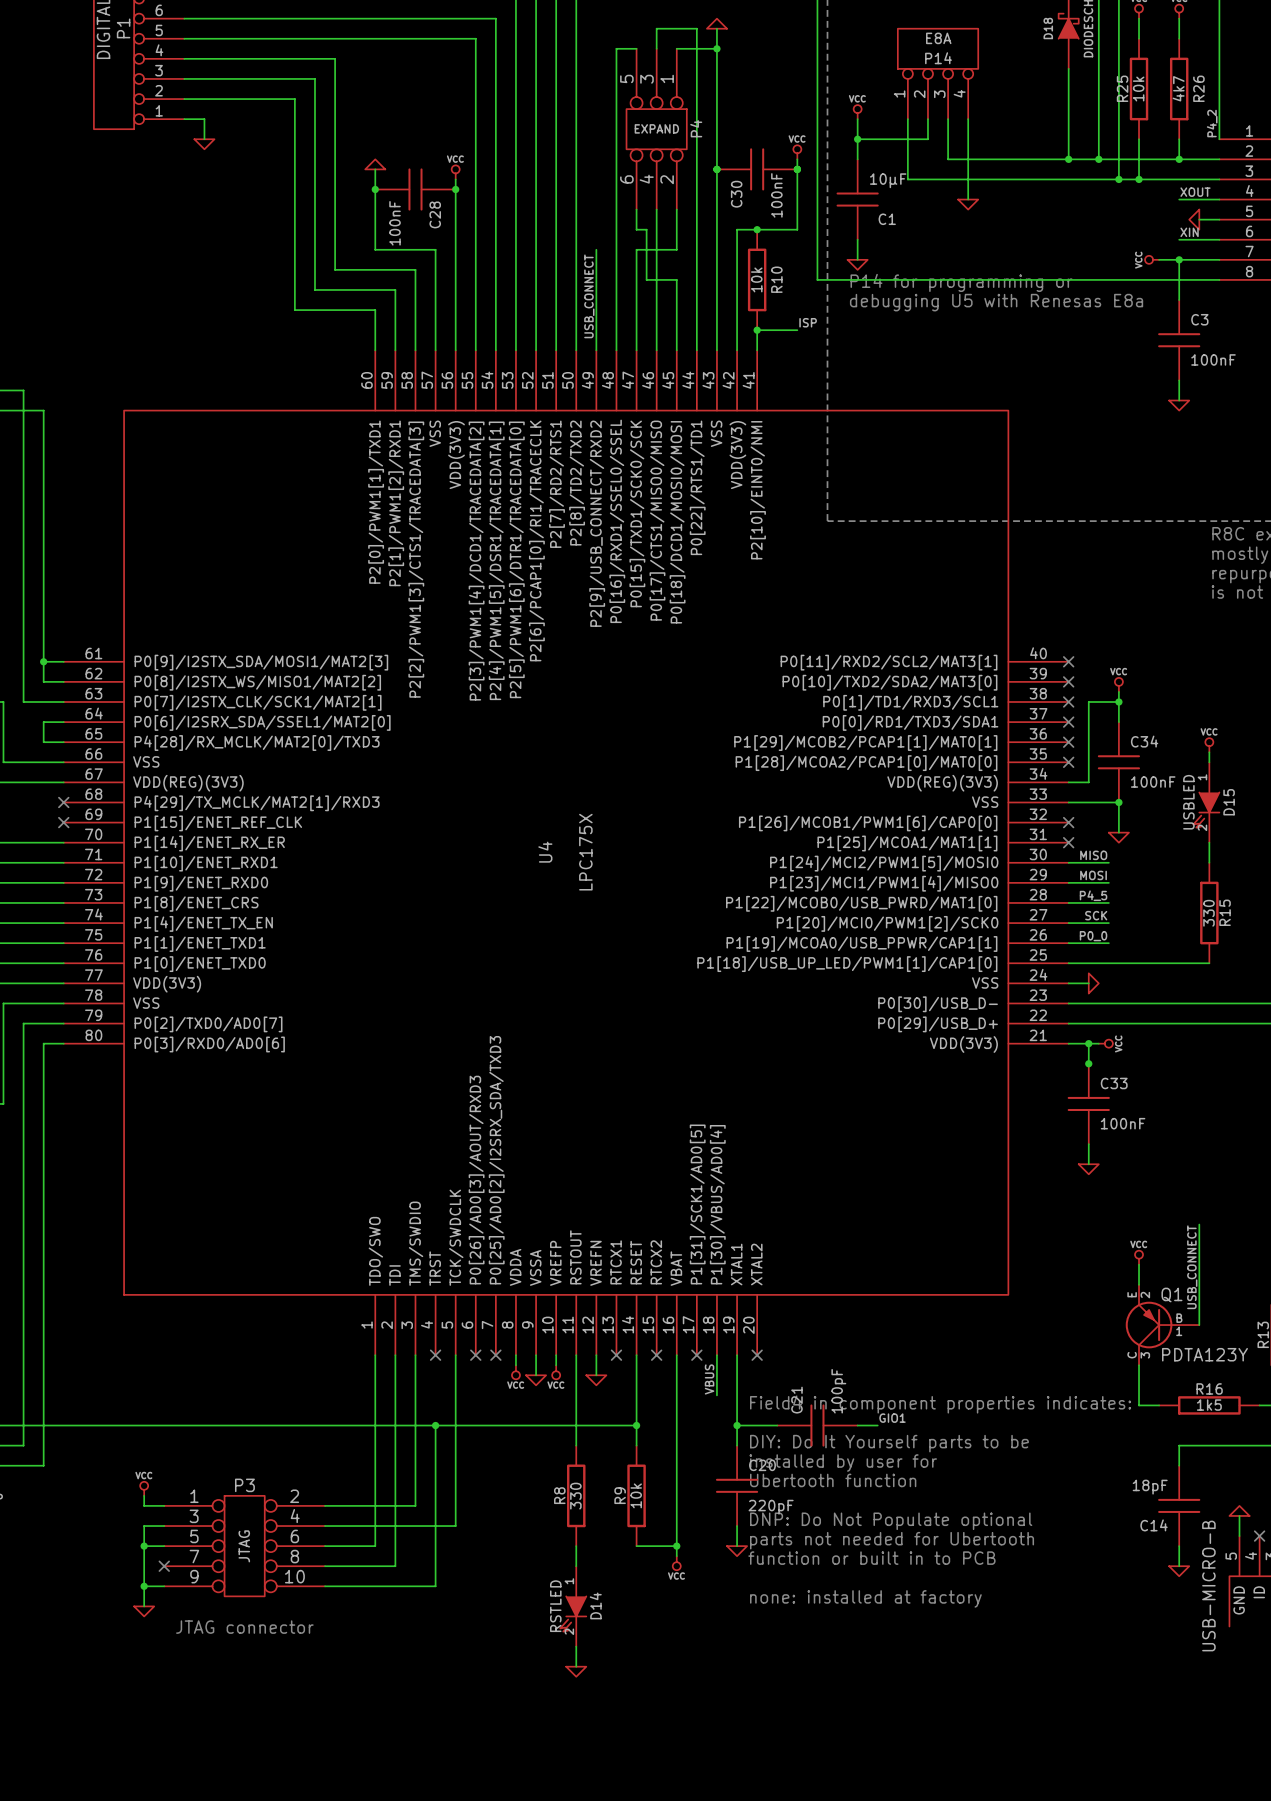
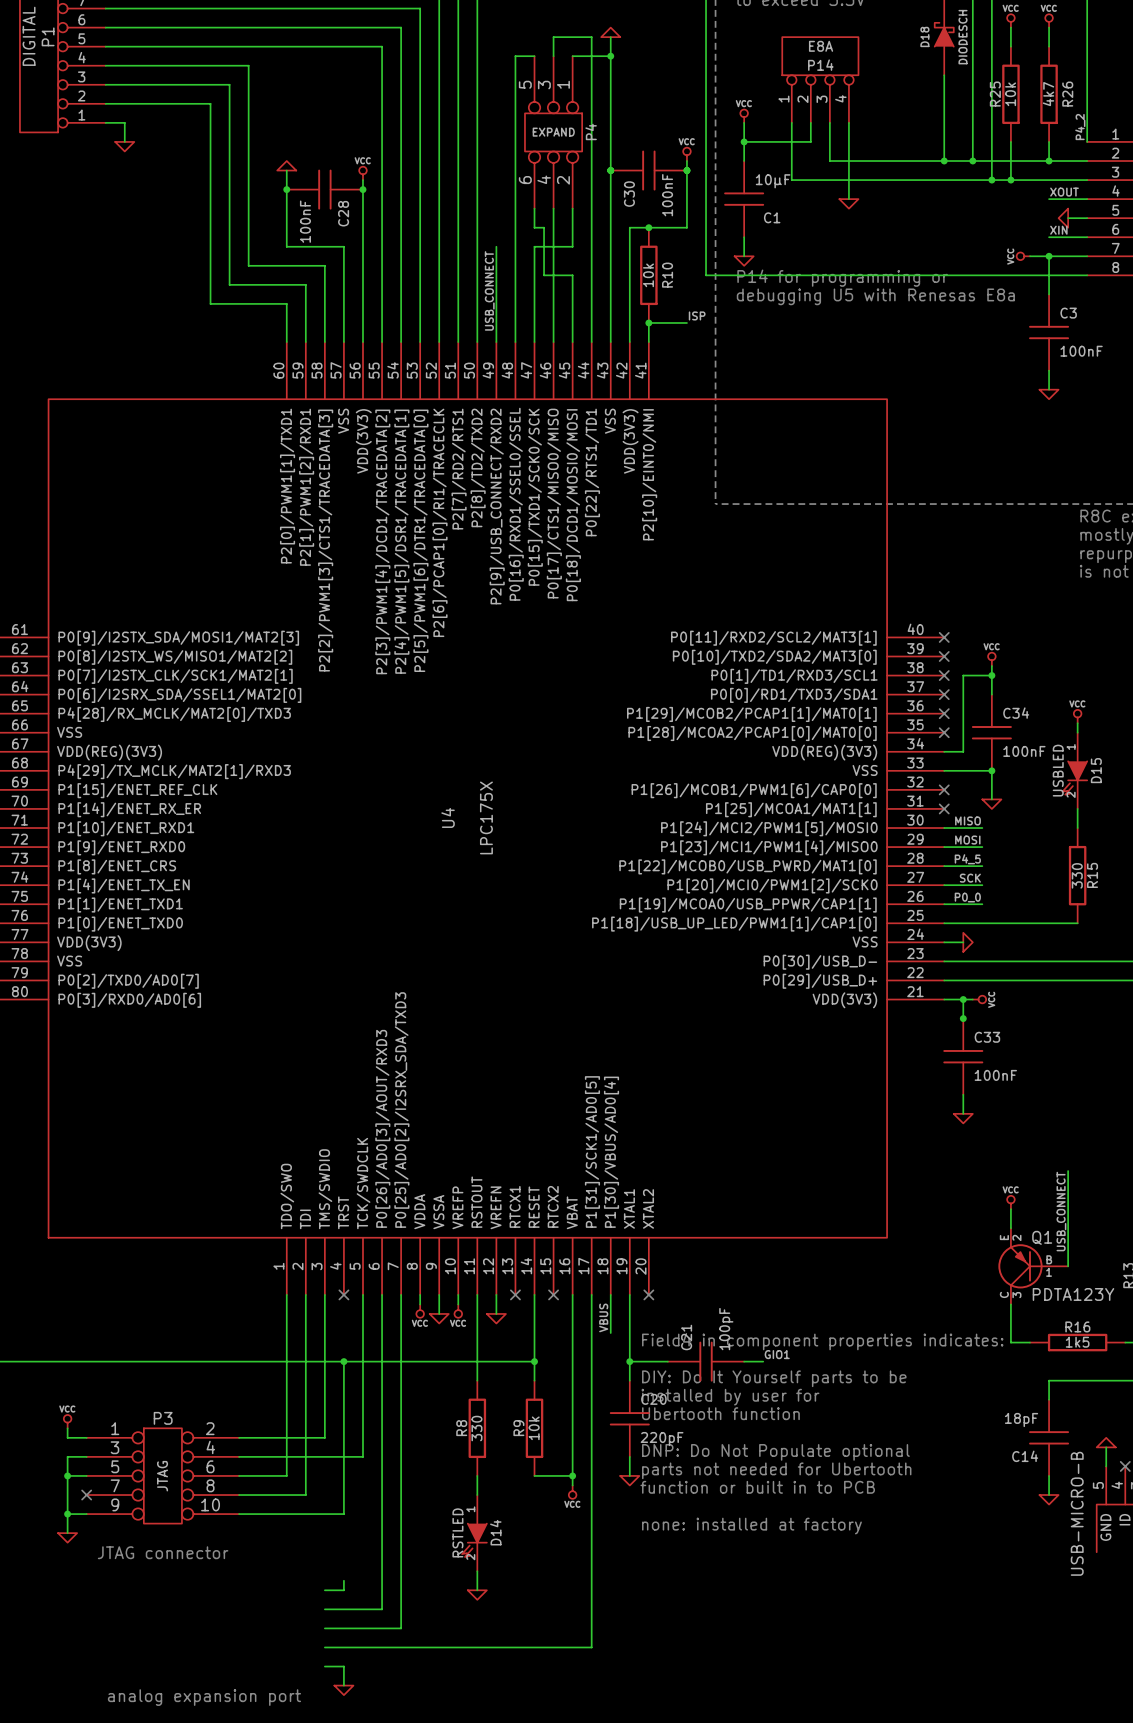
wire: none -> (382, 1294) (382, 1609) (324, 1609)
no-connect mark: (475, 1355) -> none
wire: none -> (401, 1294) (401, 1628) (324, 1628)
no-connect mark: (495, 1355) -> none
wire: none -> (591, 1294) (591, 1647) (324, 1647)
no-connect mark: (696, 1355) -> none
wire: none -> (343, 1580) (343, 1590) (324, 1590)
wire: none -> (324, 1666) (343, 1666) (343, 1685)
power symbol: none -> (343, 1690)
text: none -> analog expansion port (204, 1697)

